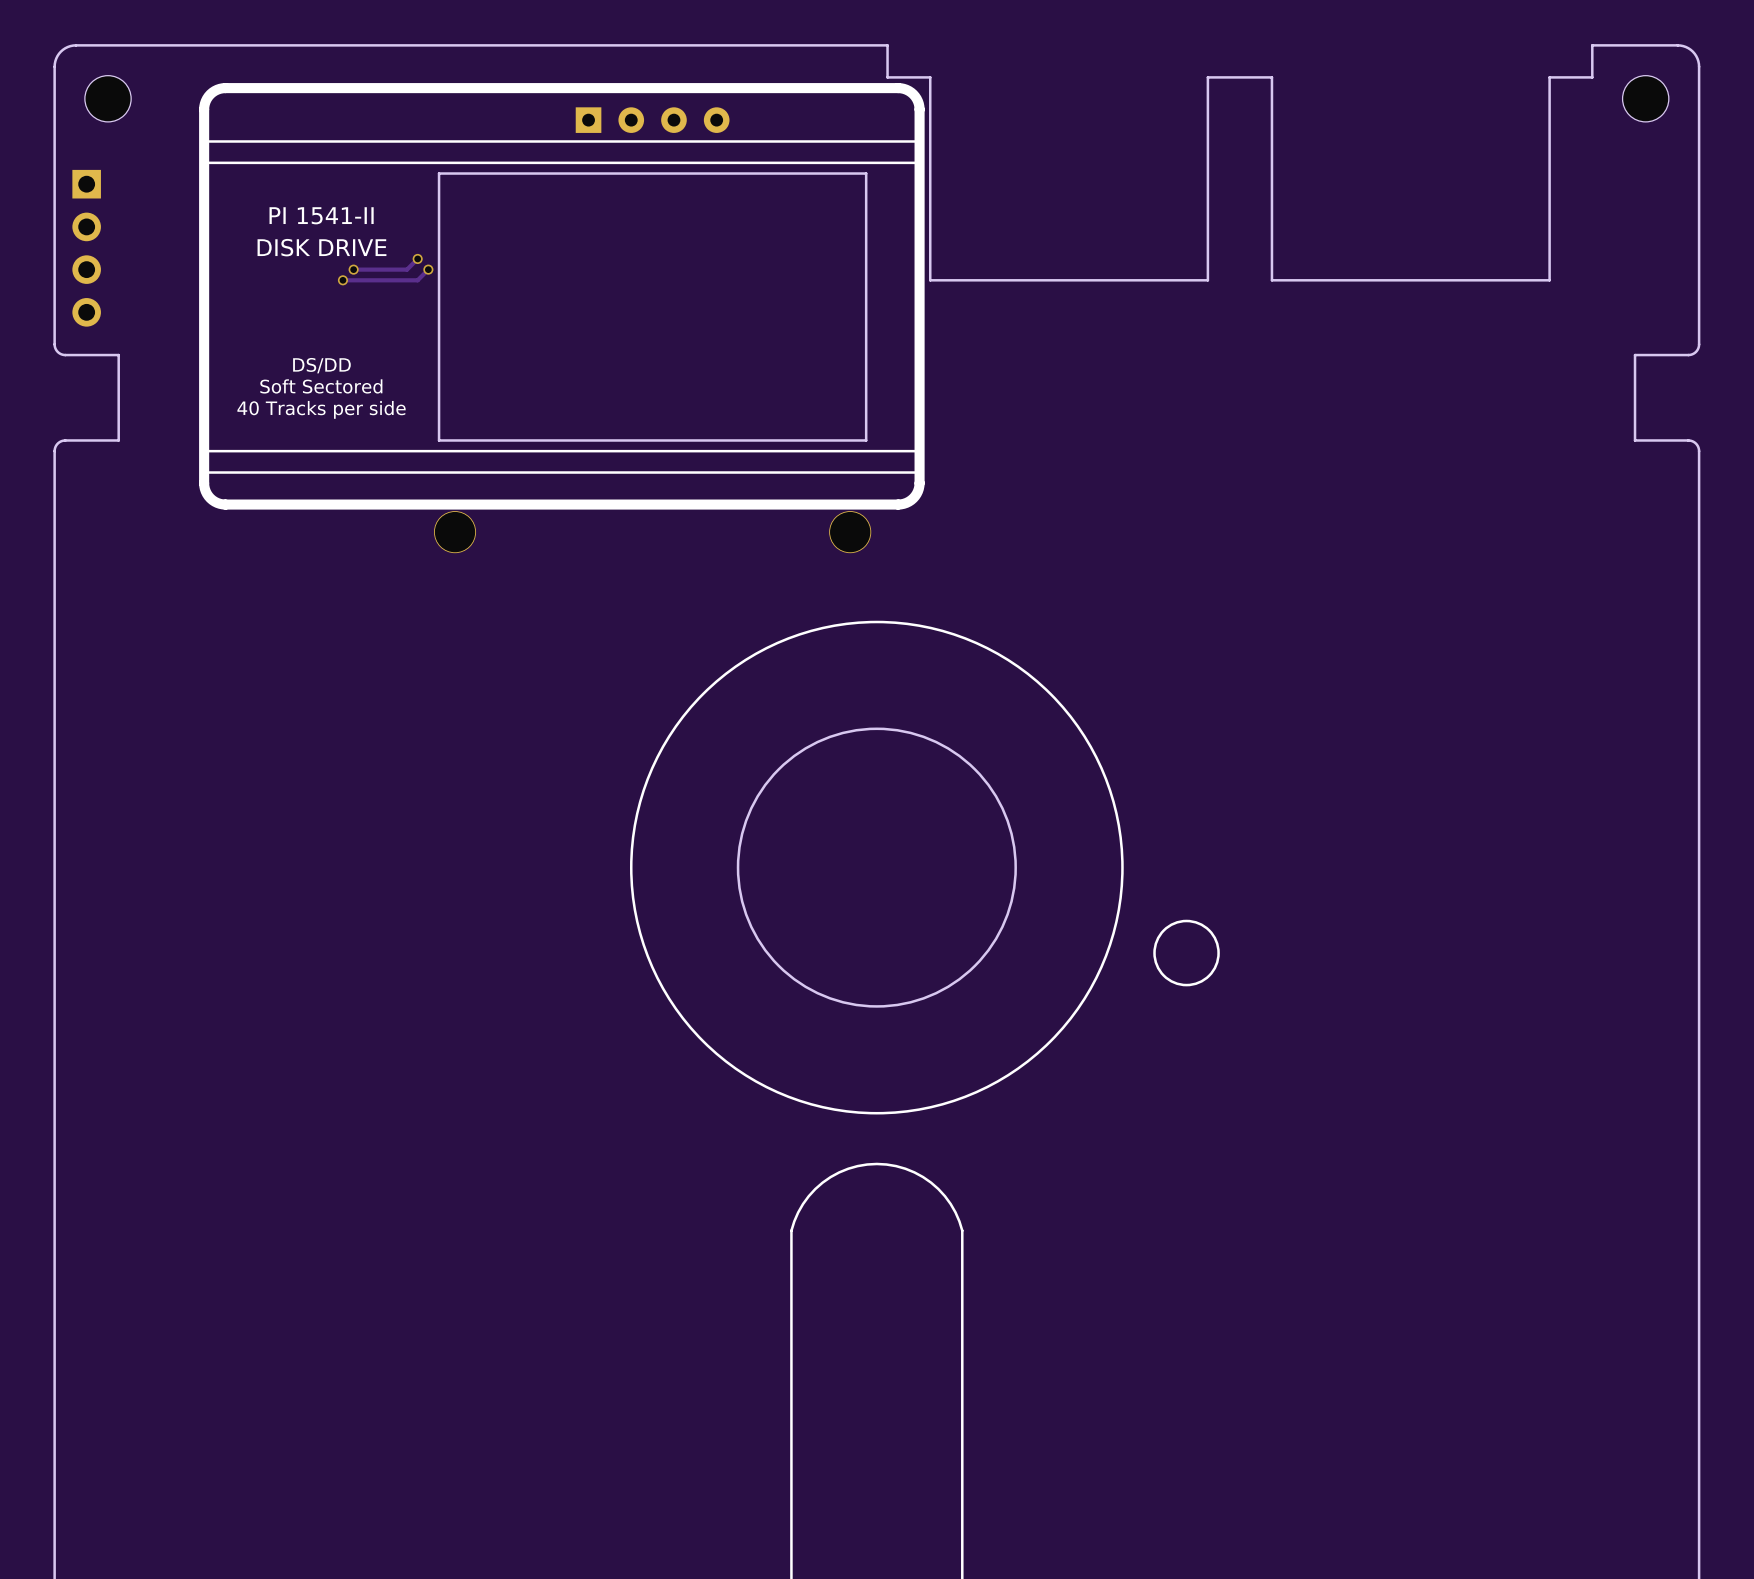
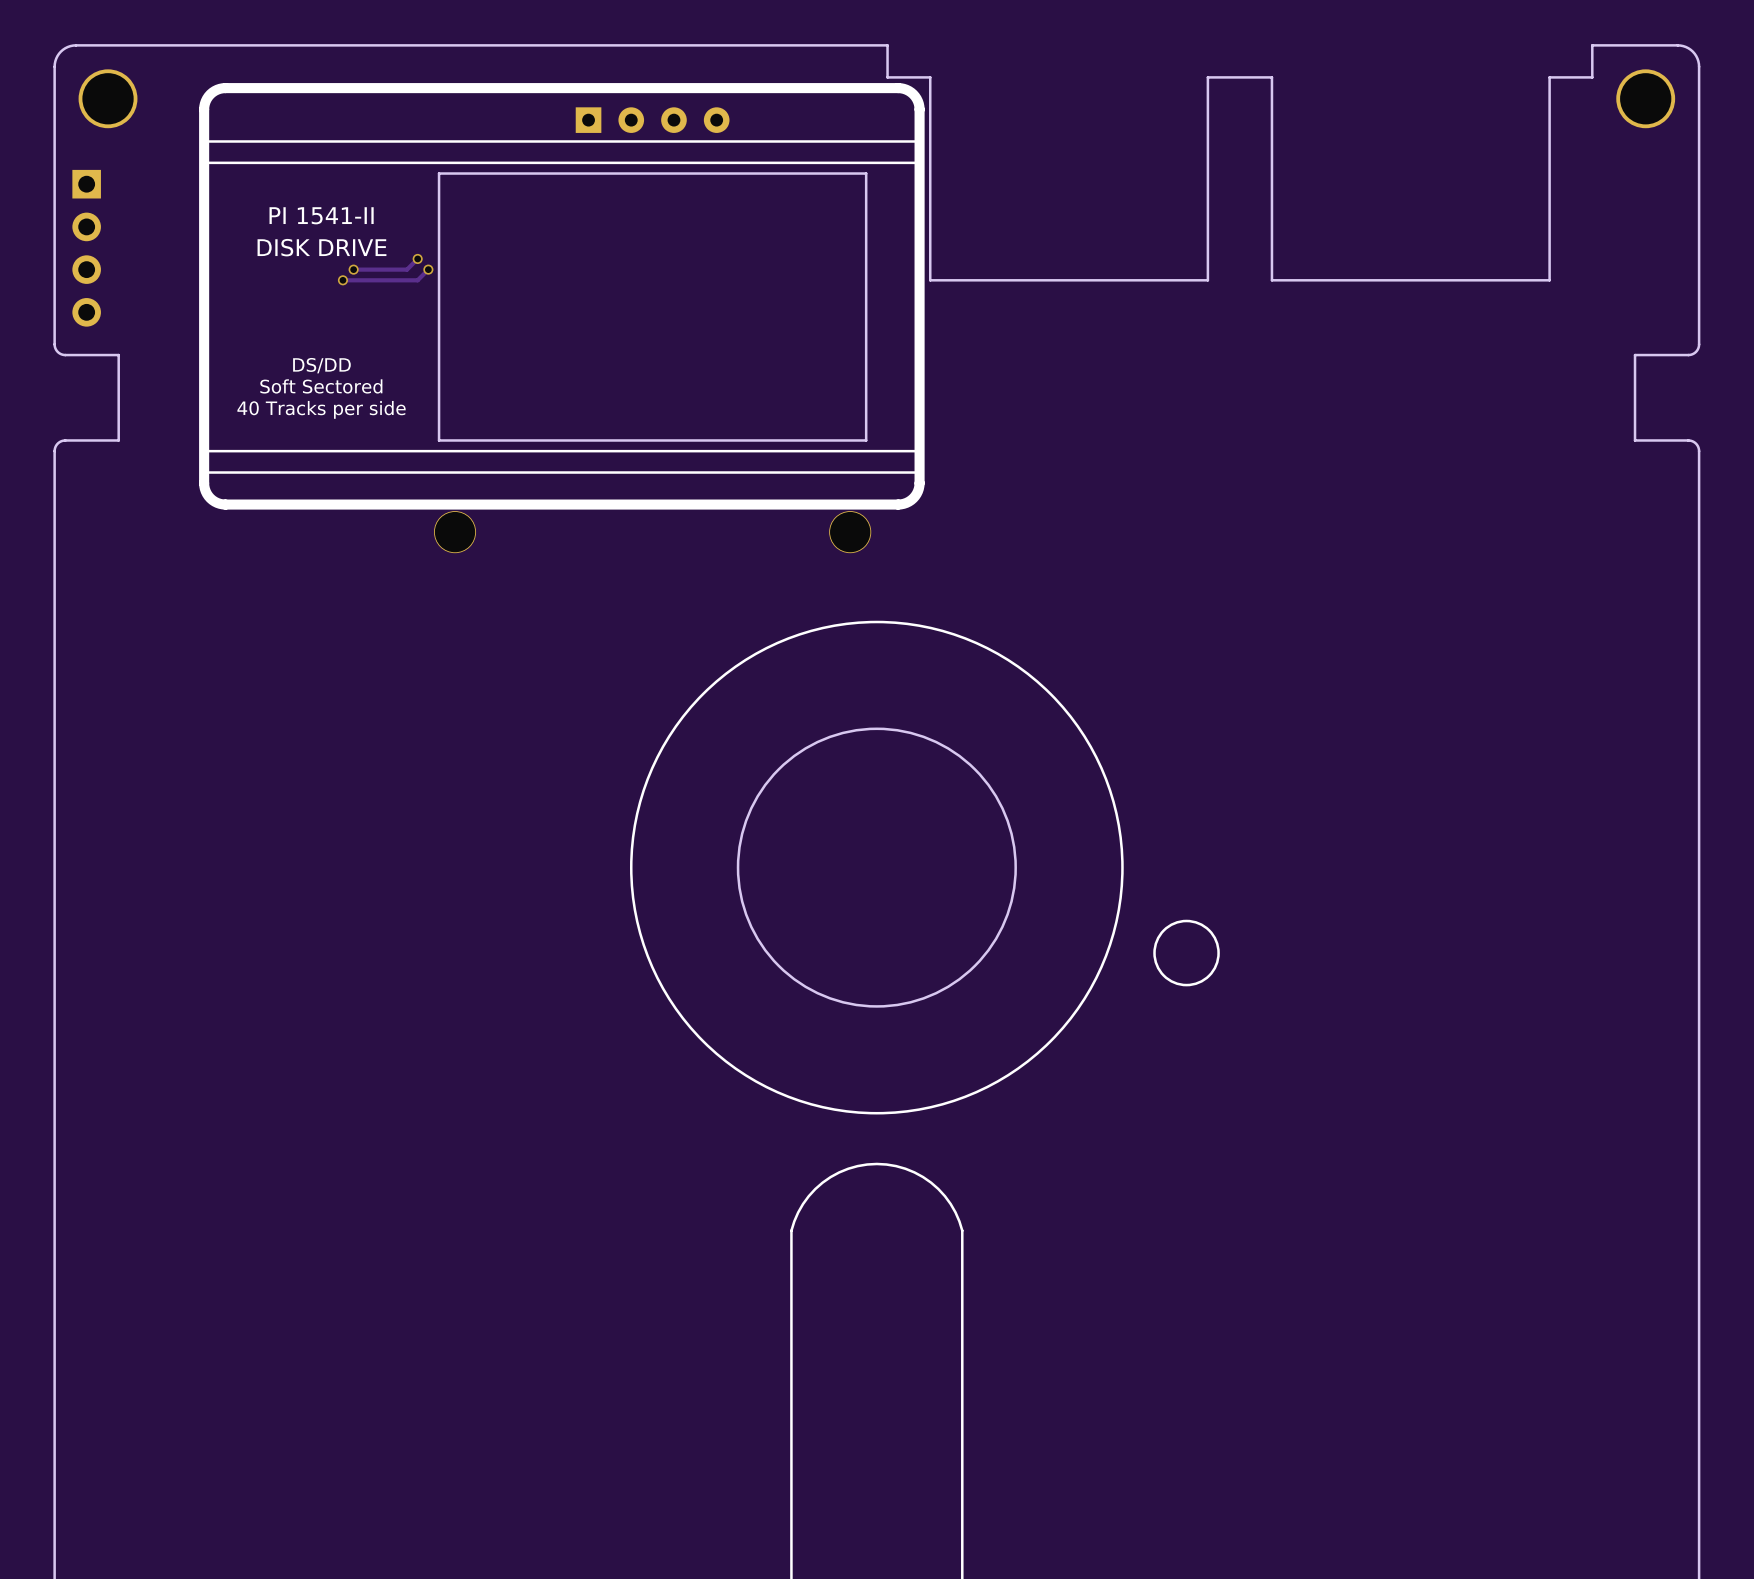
part footprint: [84, 75, 132, 122] -> [78, 69, 138, 129]
part footprint: [1622, 75, 1669, 122] -> [1616, 69, 1676, 129]

